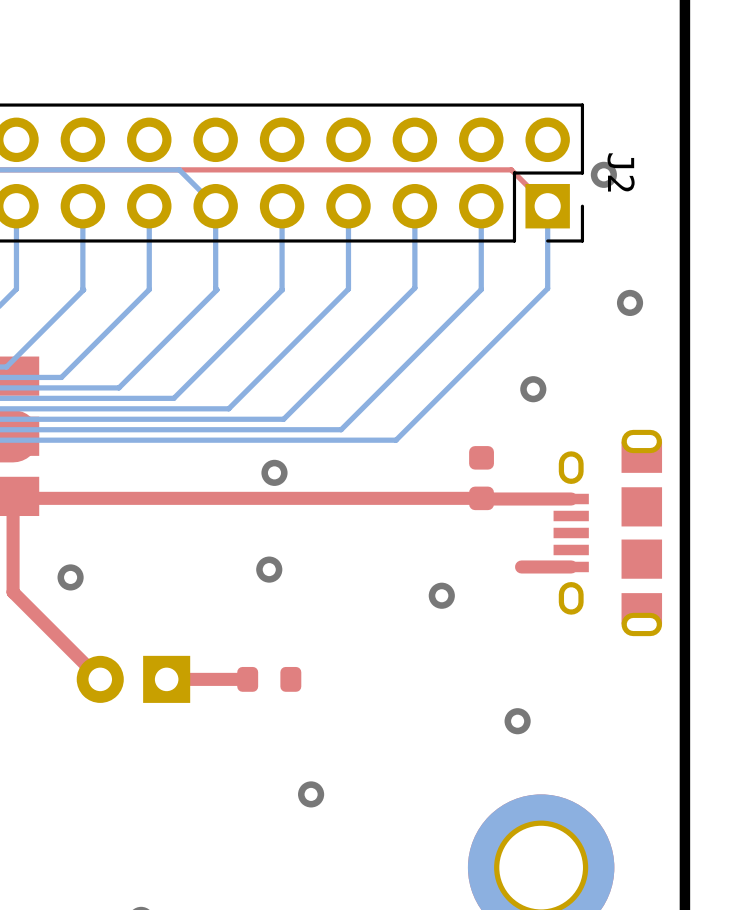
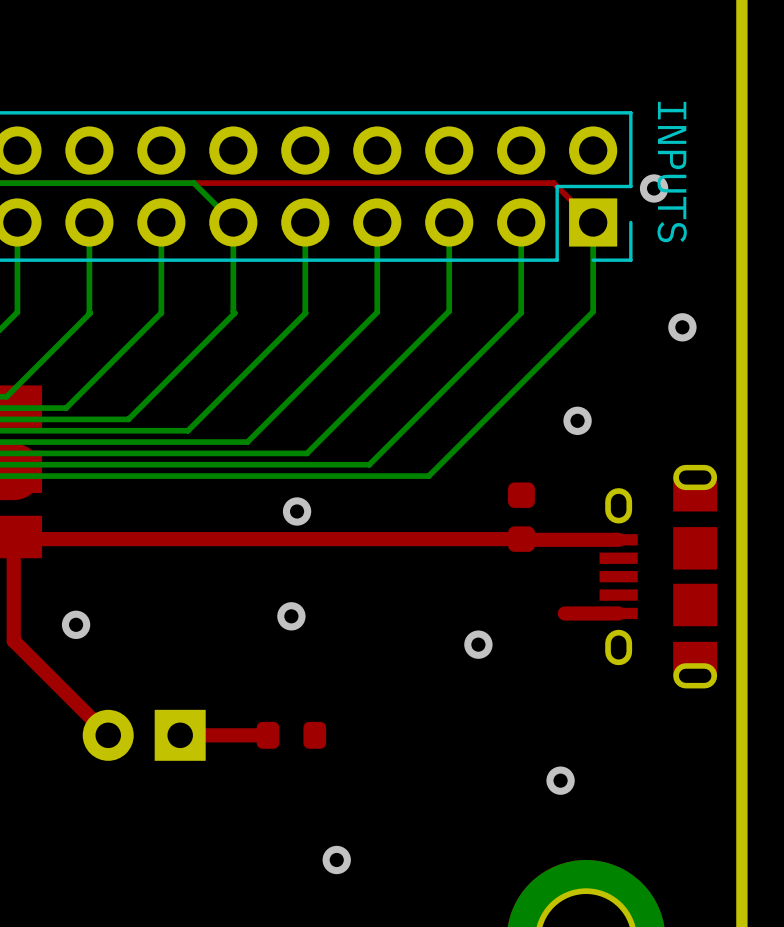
J2 value: none -> INPUTS (672, 172)
J2 name: J2 (621, 172) -> none

